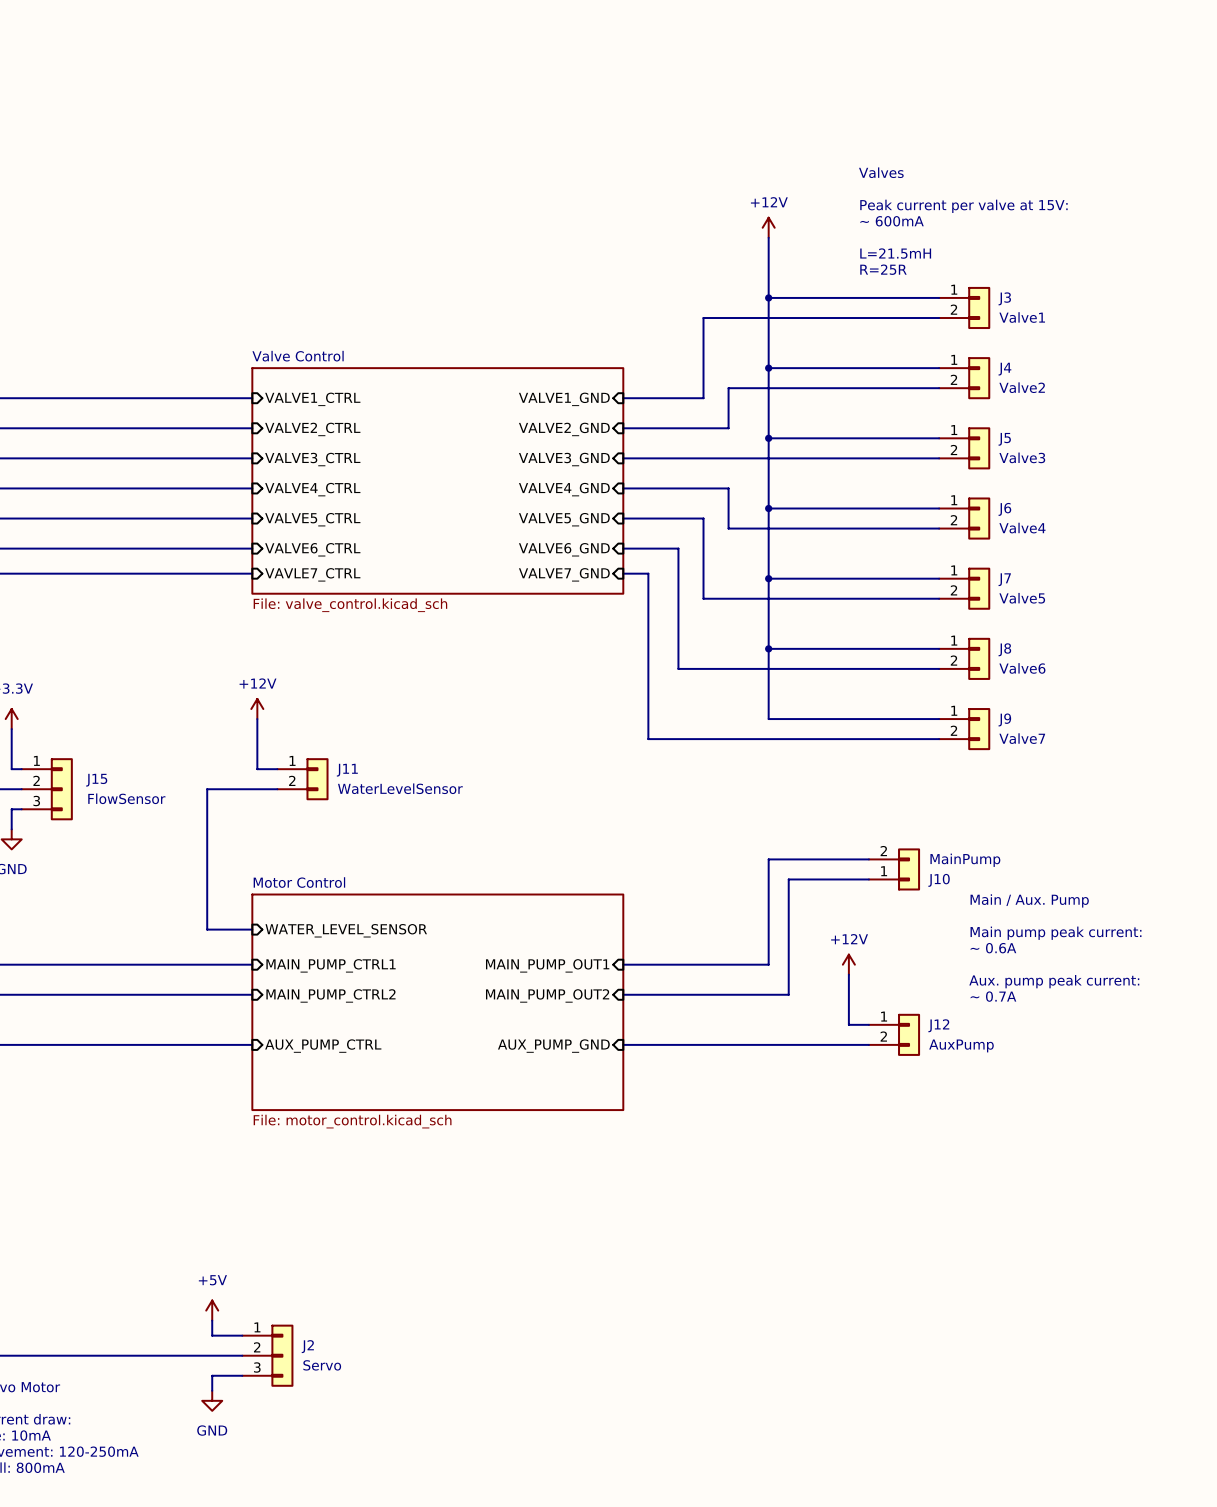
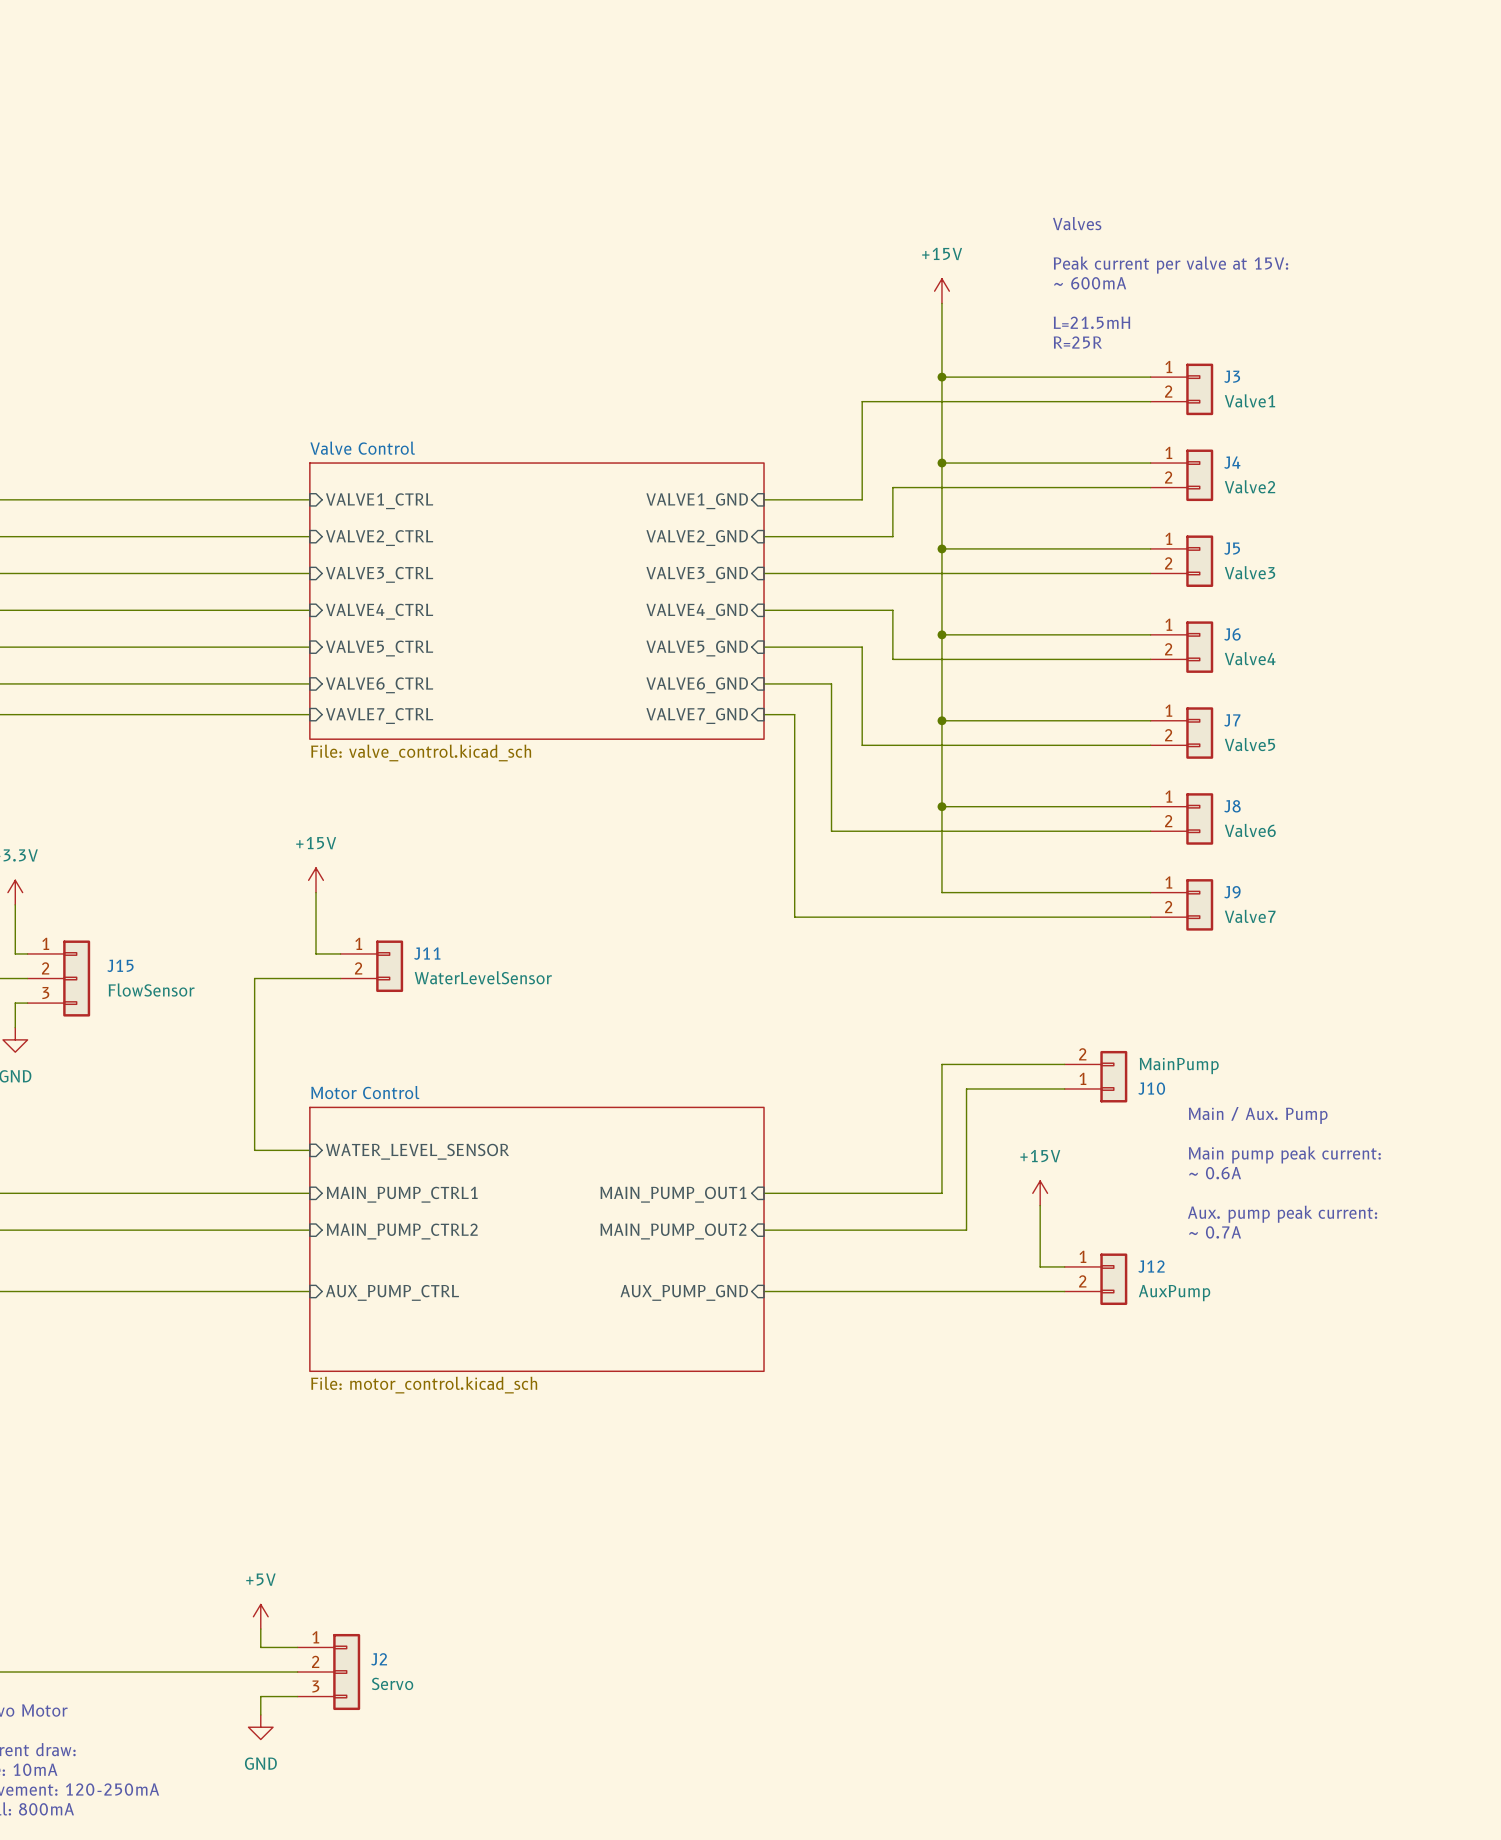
power symbol: +12V (768, 227) -> +15V (941, 291)
power symbol: +12V (257, 709) -> +15V (316, 880)
power symbol: +12V (848, 964) -> +15V (1040, 1193)

